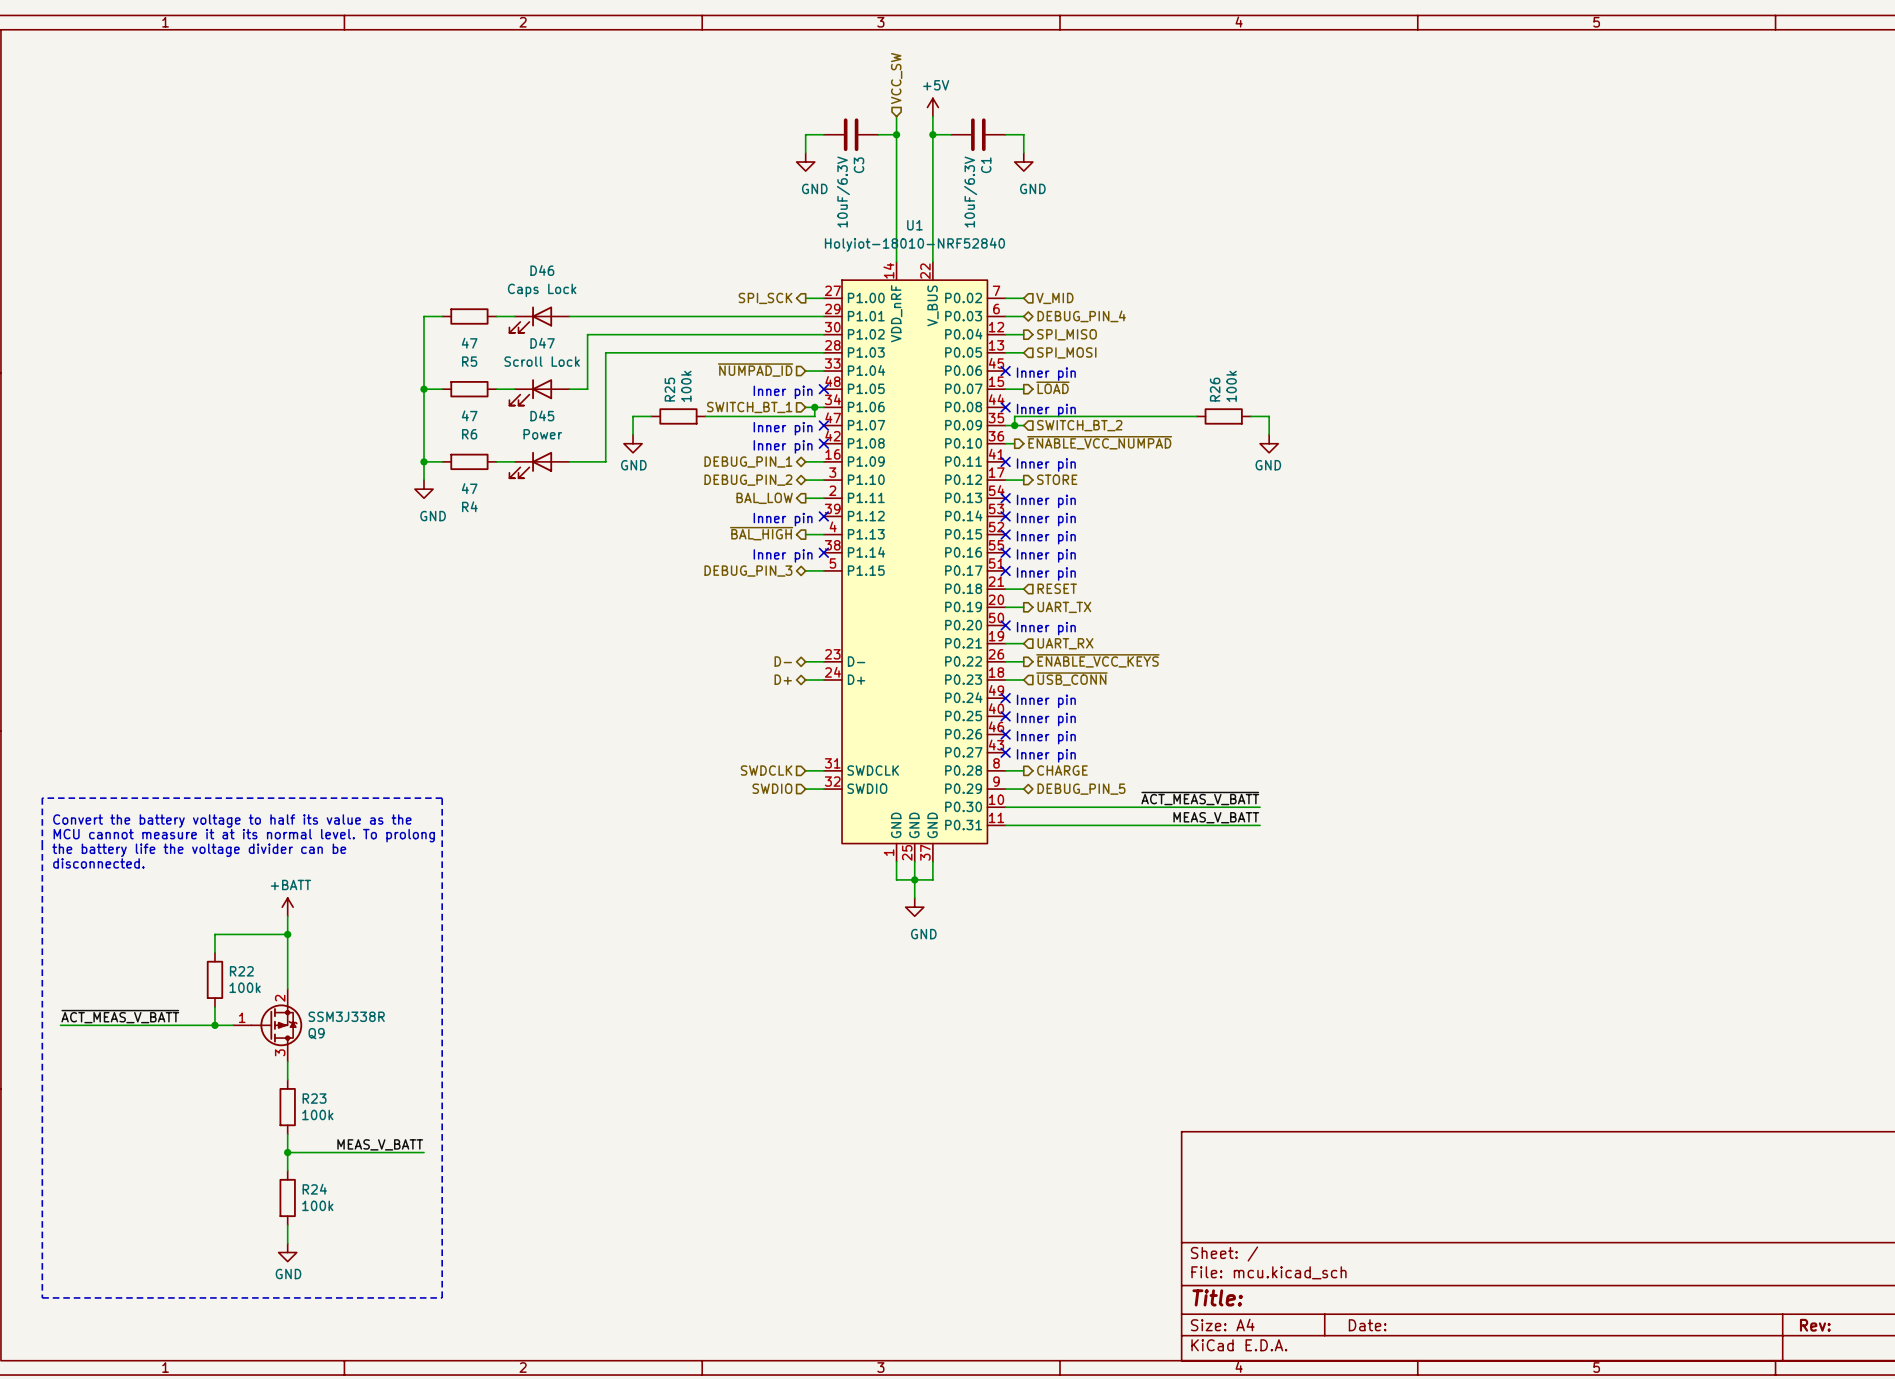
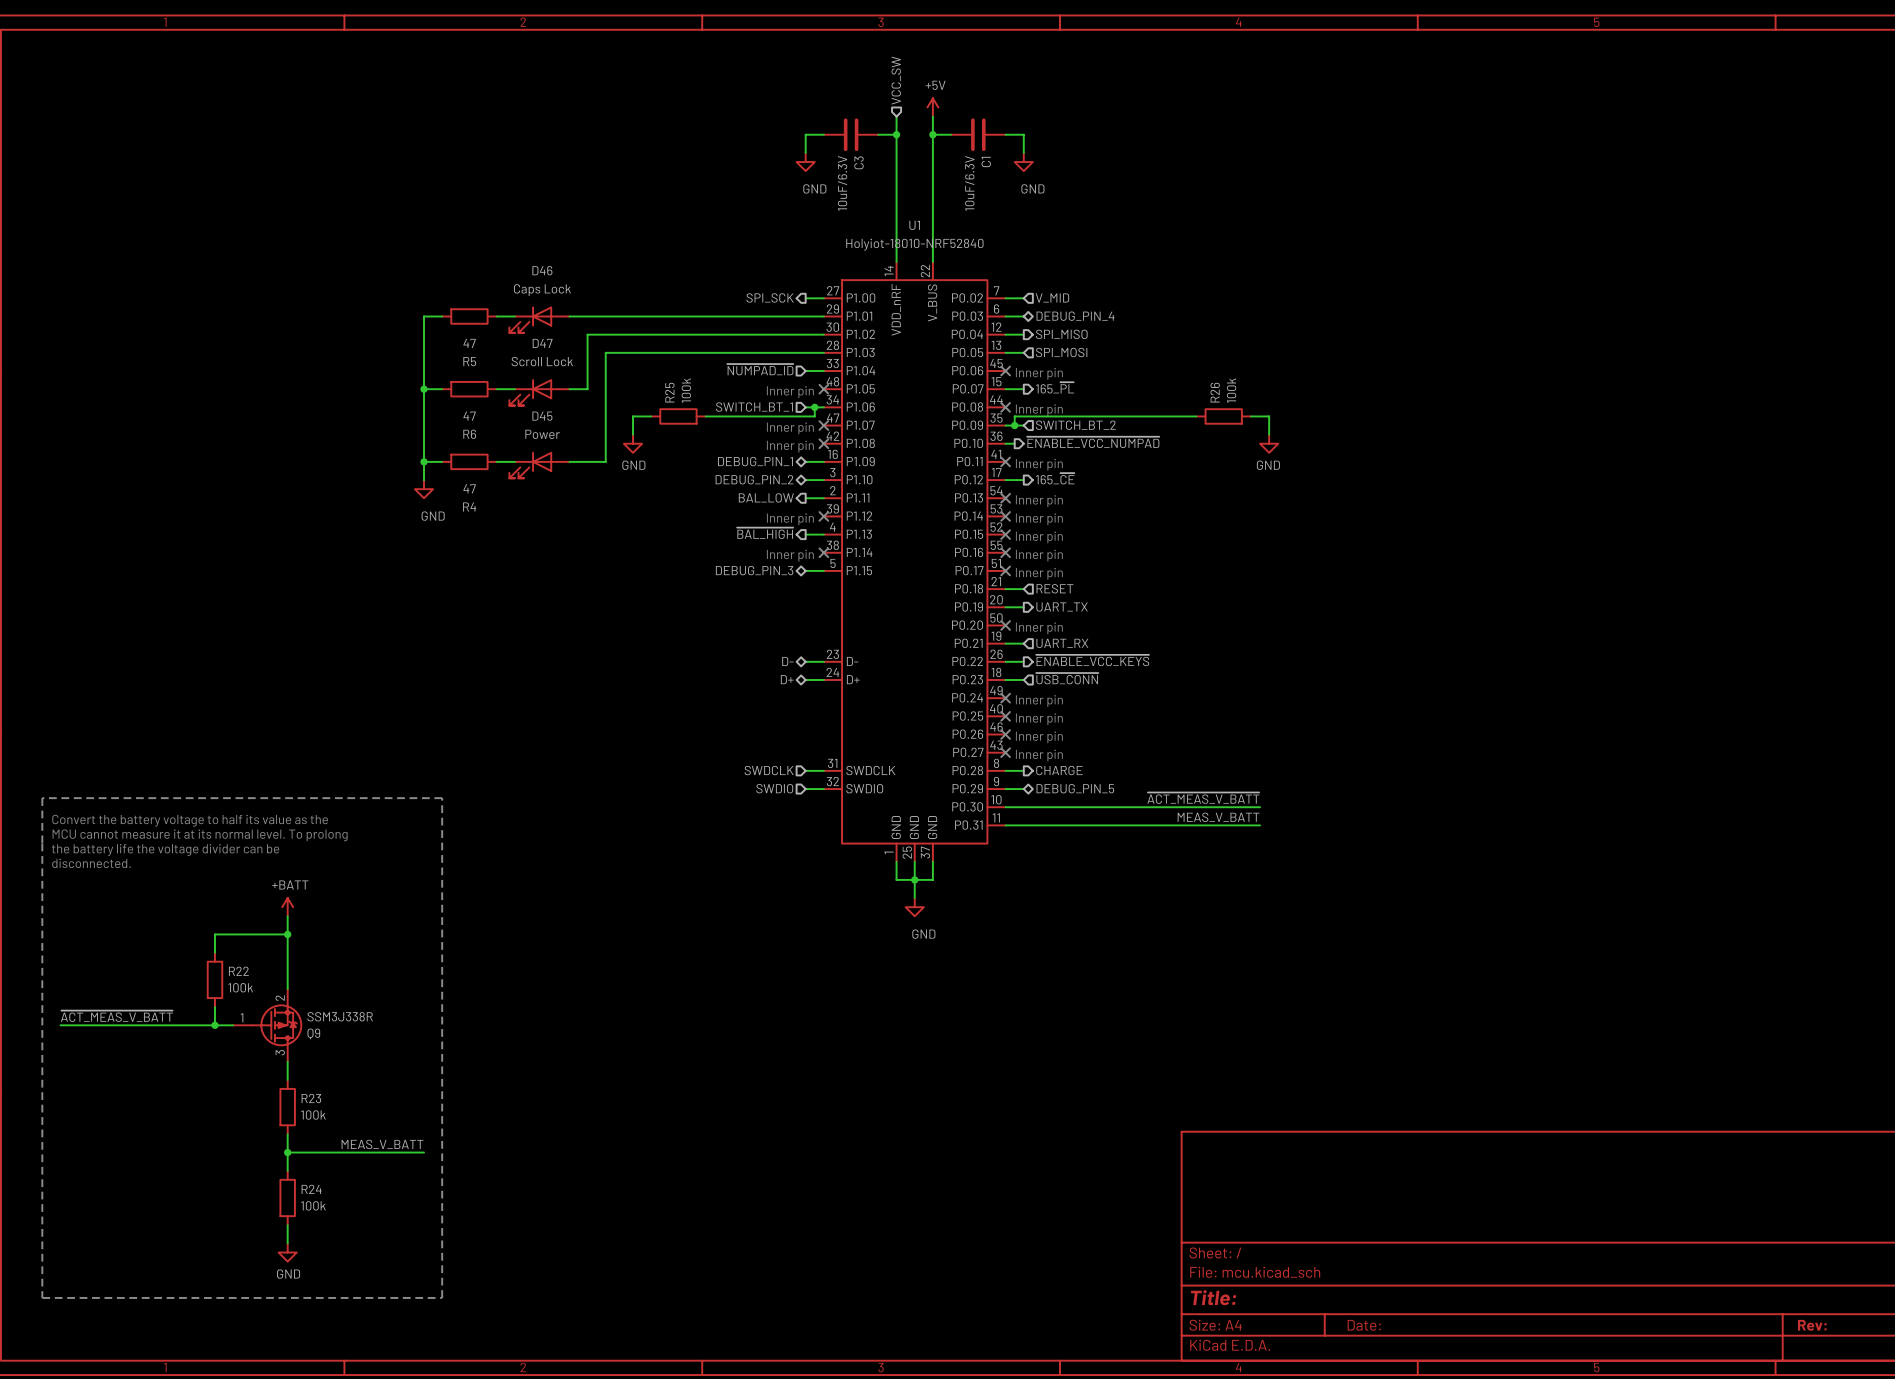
hierarchical label: ~{LOAD} (1052, 387) -> 165_~{PL} (1055, 387)
hierarchical label: STORE (1057, 479) -> 165_~{CE} (1055, 478)

